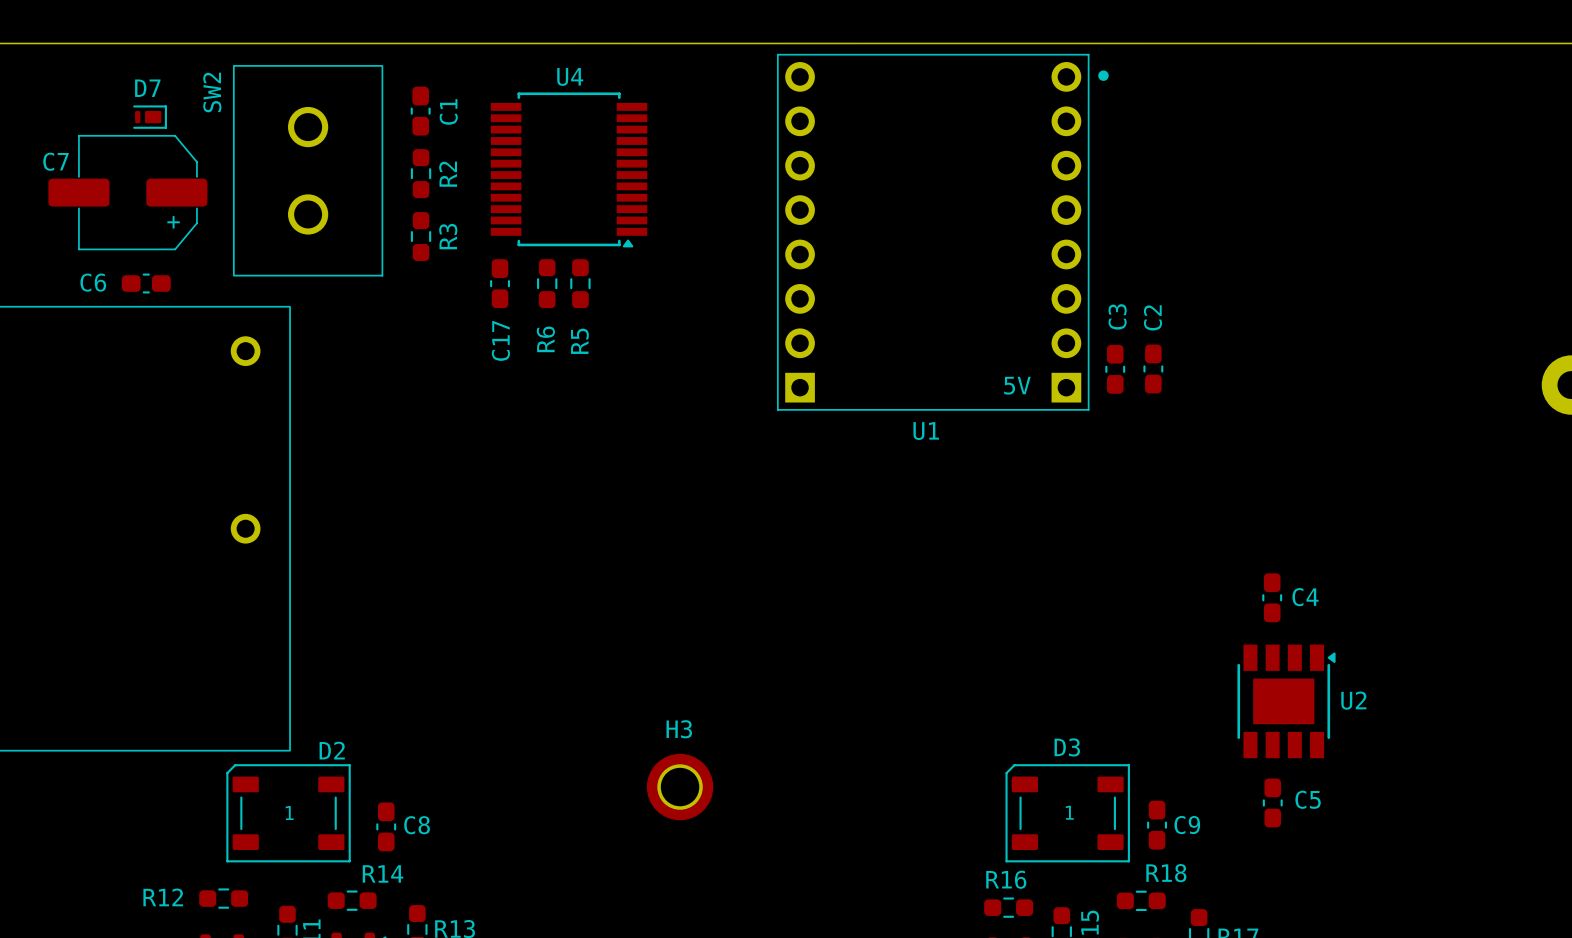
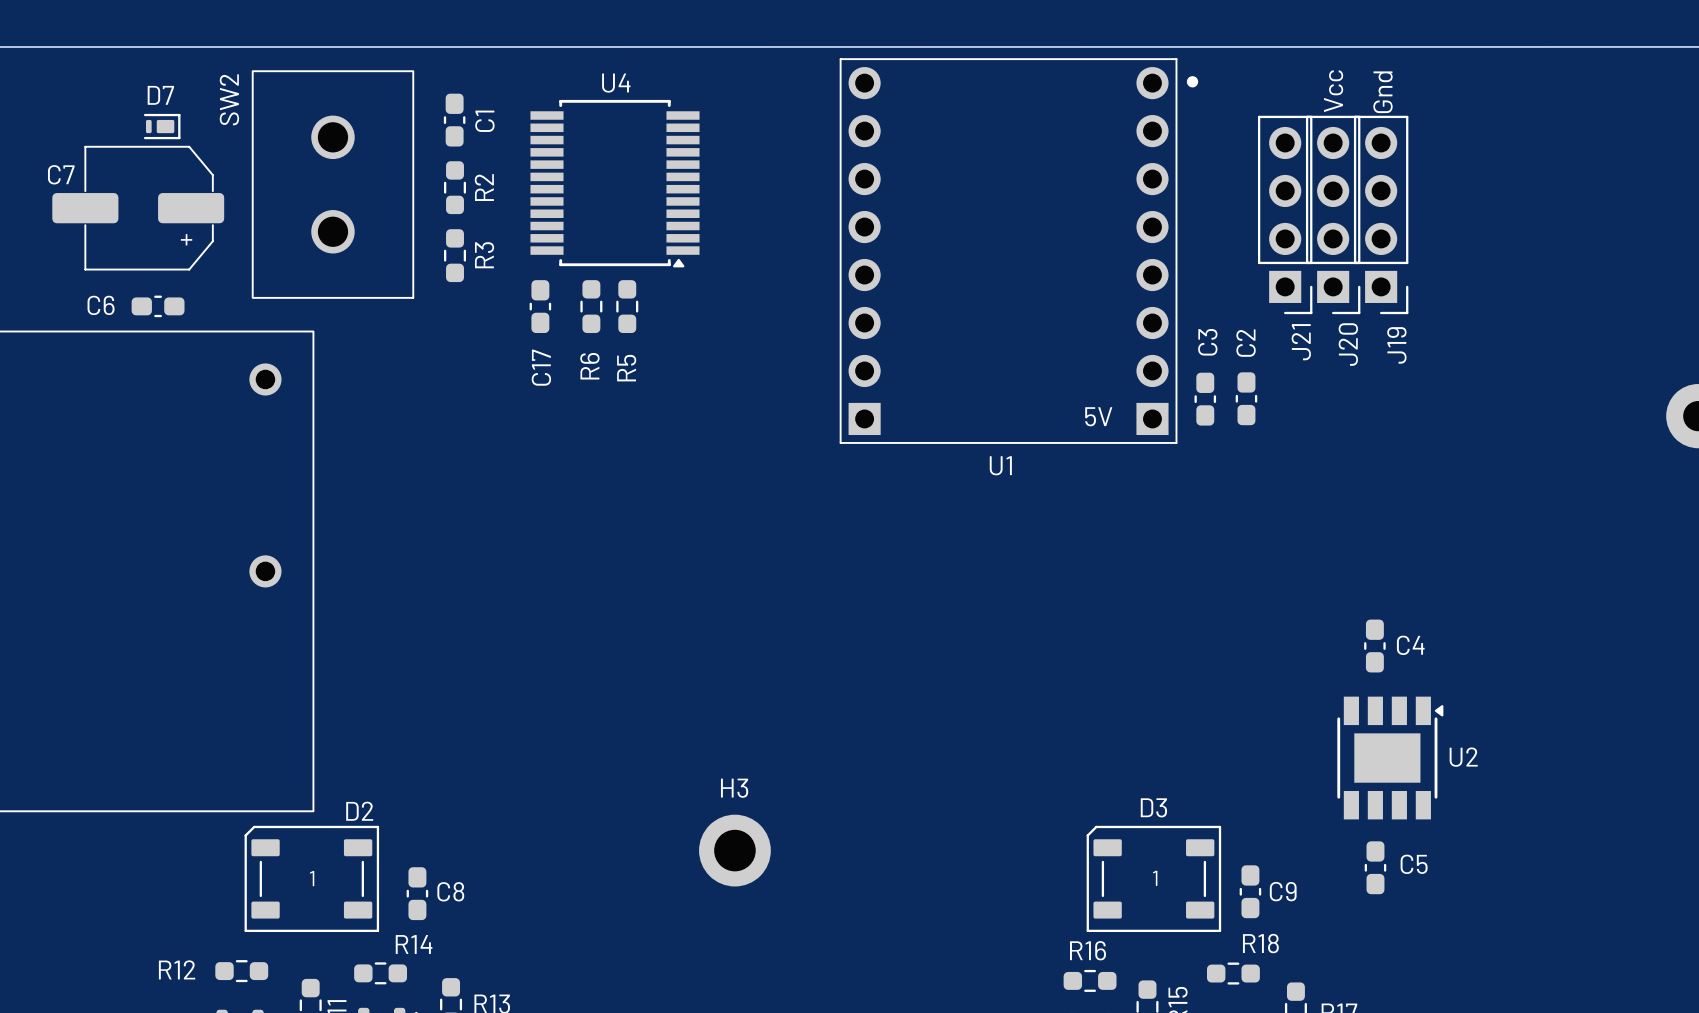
text: none -> Vcc (1333, 91)
text: none -> Gnd (1382, 92)
J21: none -> (1285, 214)
J20: none -> (1333, 214)
J19: none -> (1381, 214)

